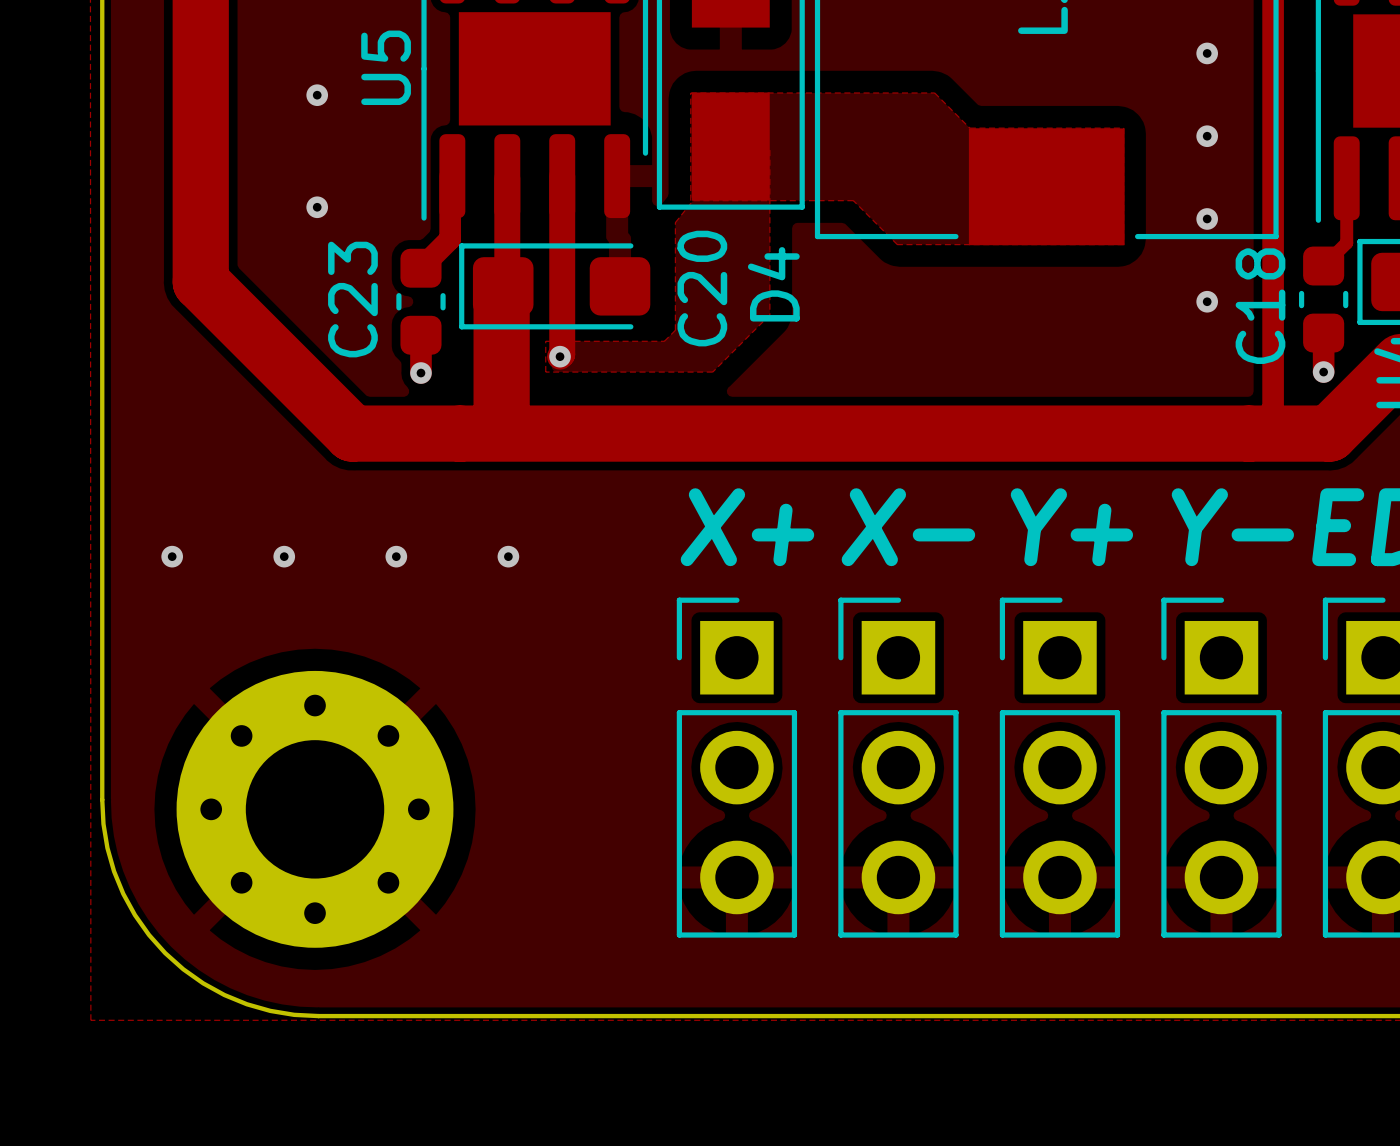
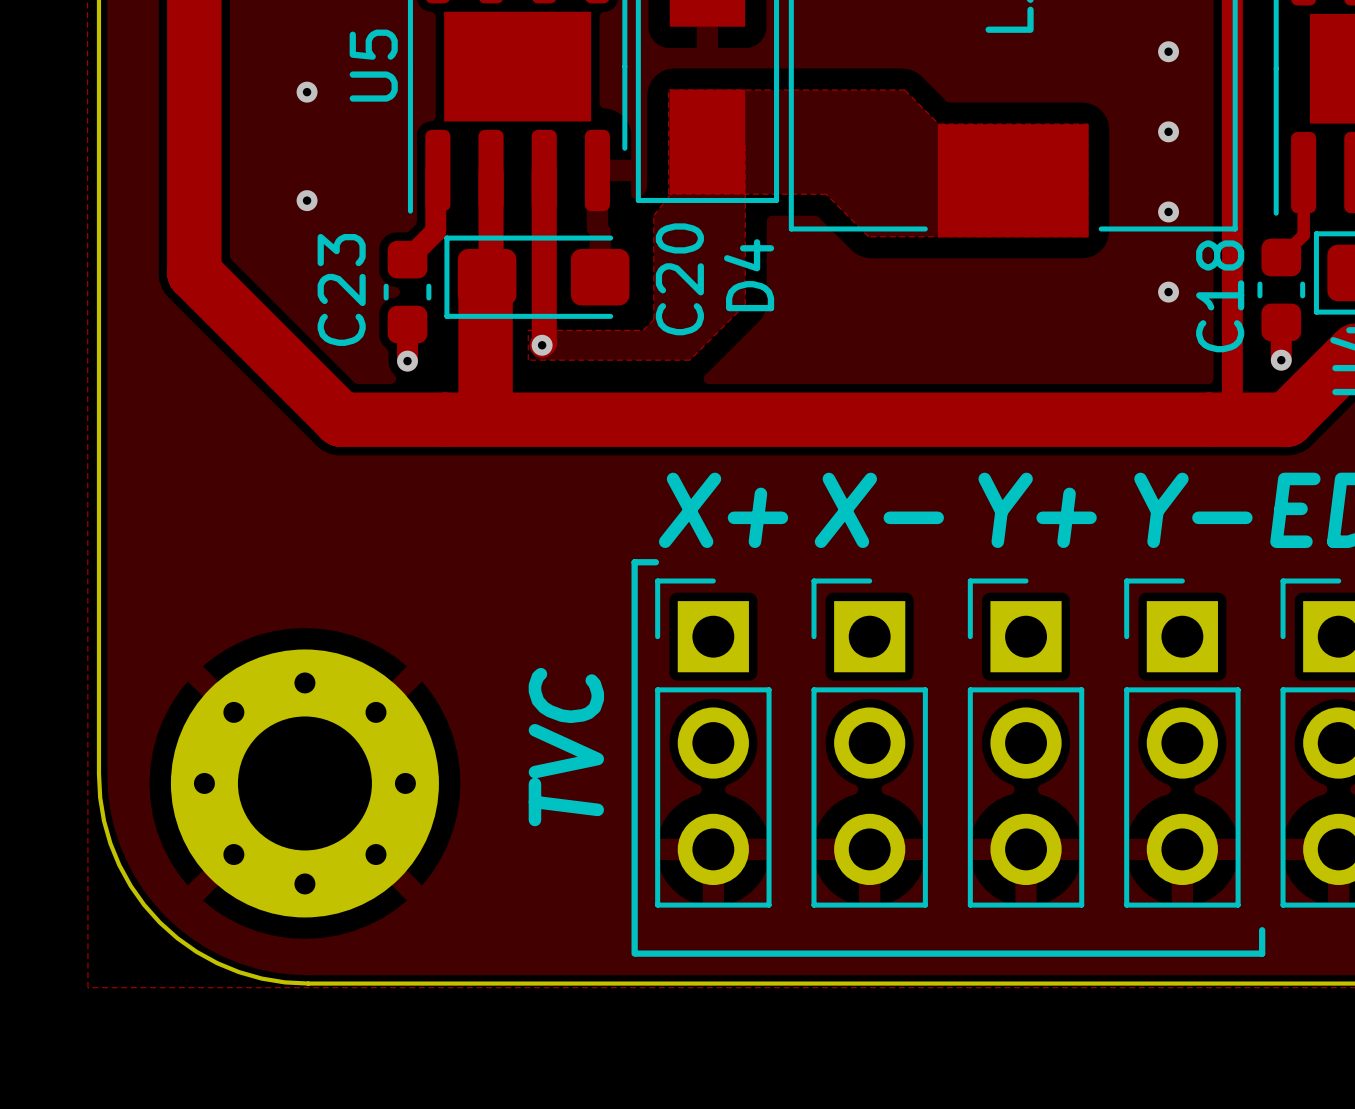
via: (172, 556) -> none
via: (284, 556) -> none
via: (396, 556) -> none
via: (508, 556) -> none
line: none -> (655, 562) (634, 562) (634, 953)
text: none -> TVC (566, 747)
line: none -> (1262, 930) (1262, 953) (636, 953)

